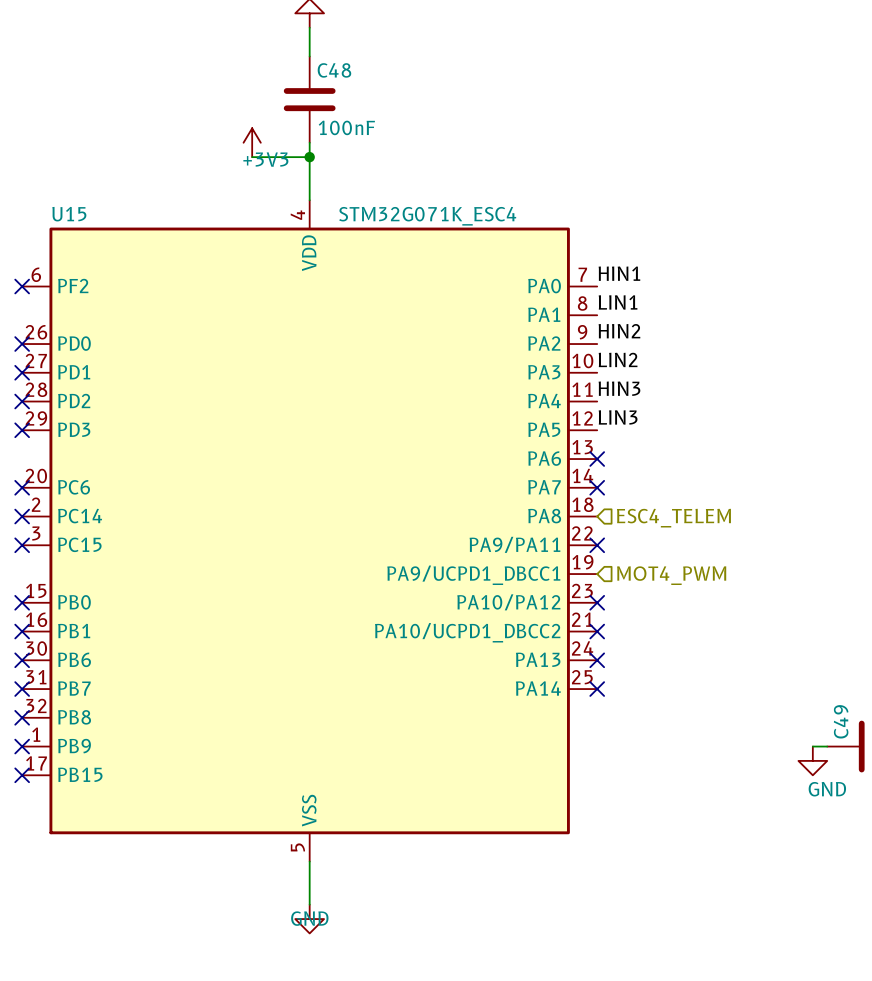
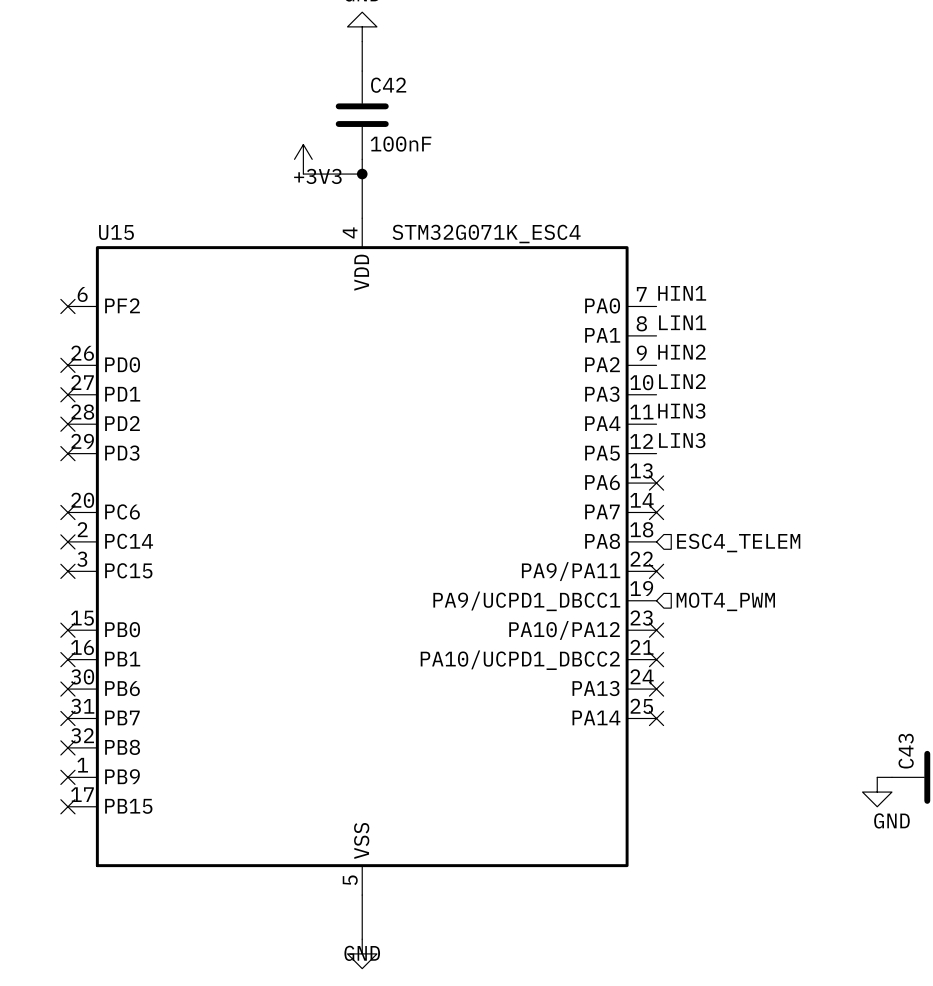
C48 name: C48 (334, 70) -> C42 (388, 85)
C49 name: C49 (841, 721) -> C43 (906, 751)

